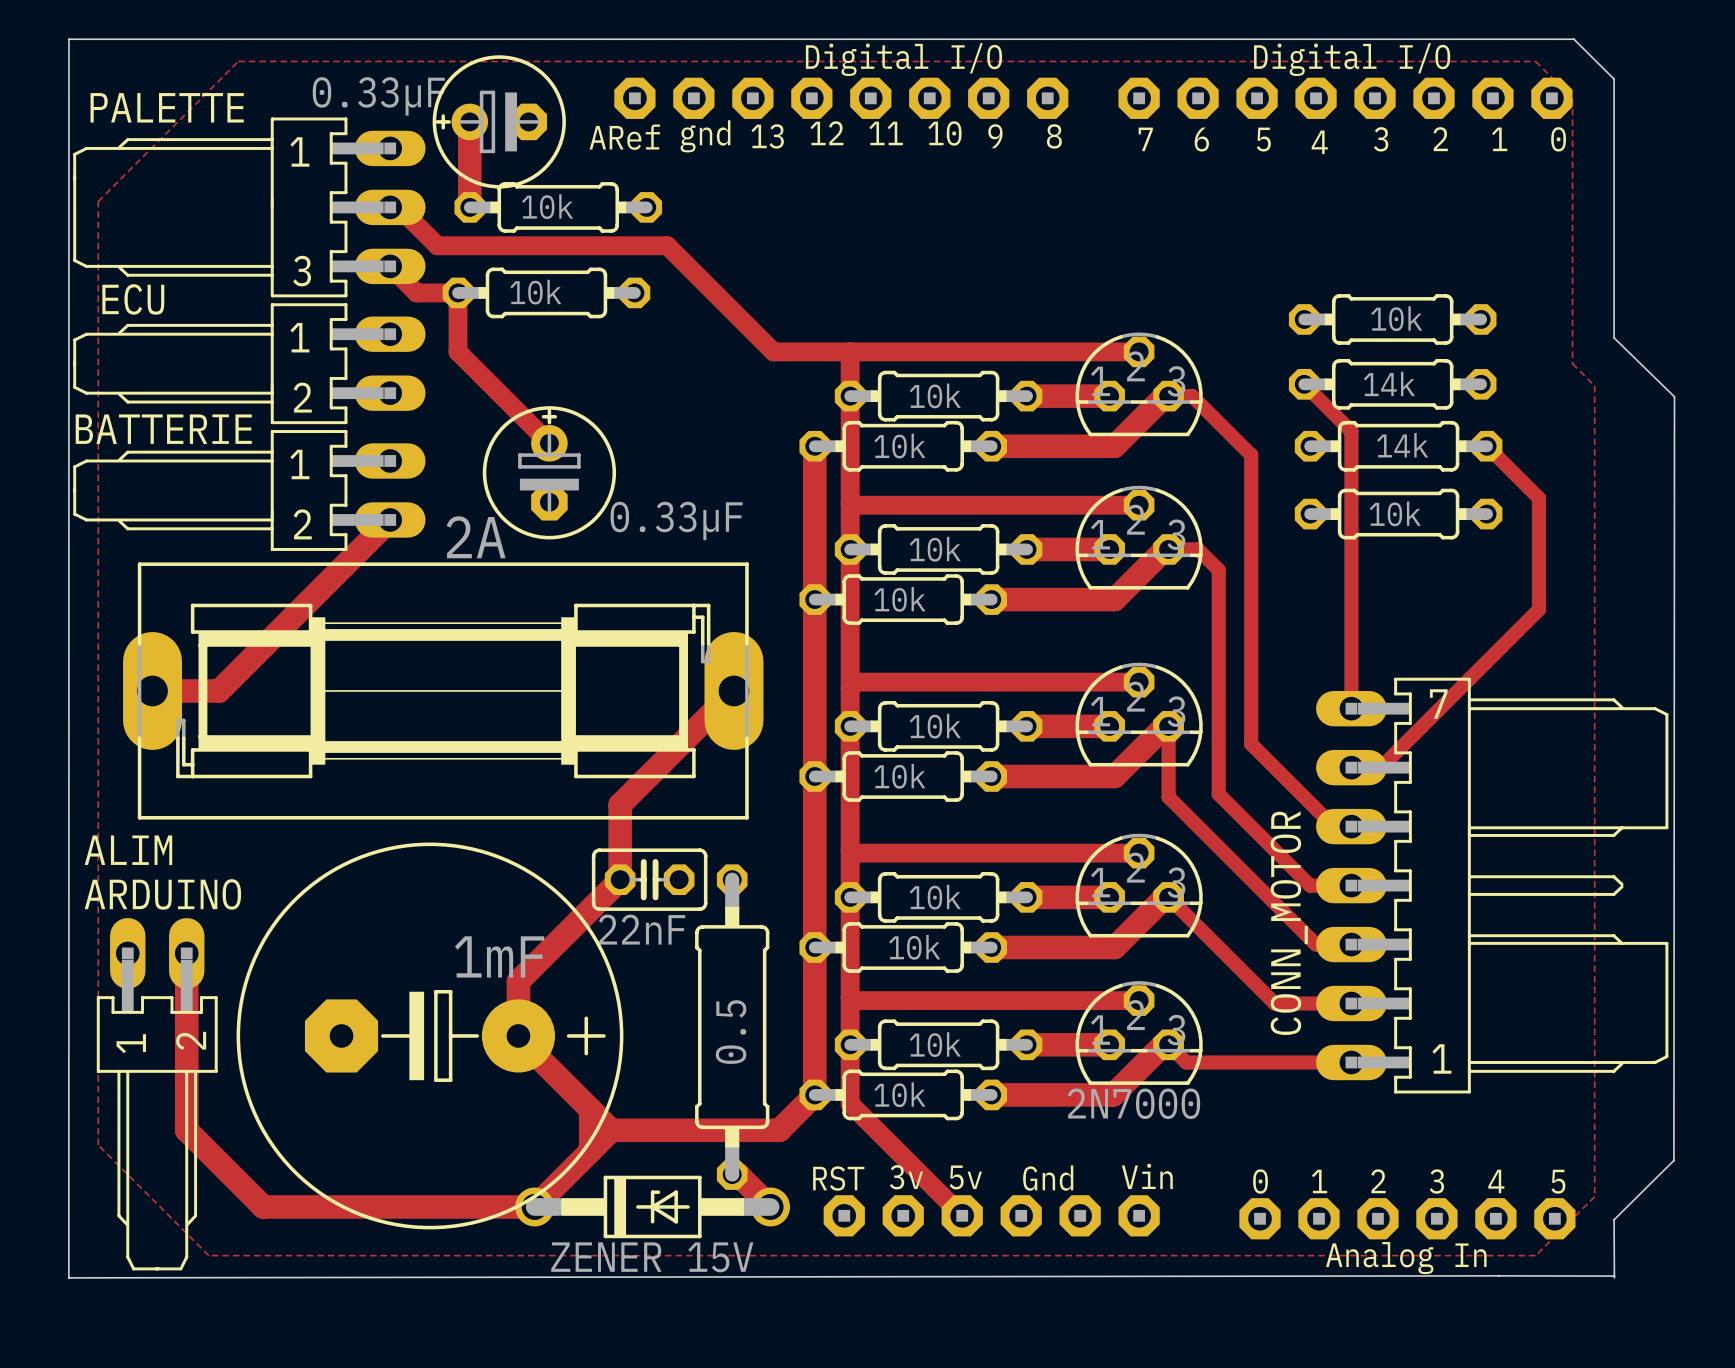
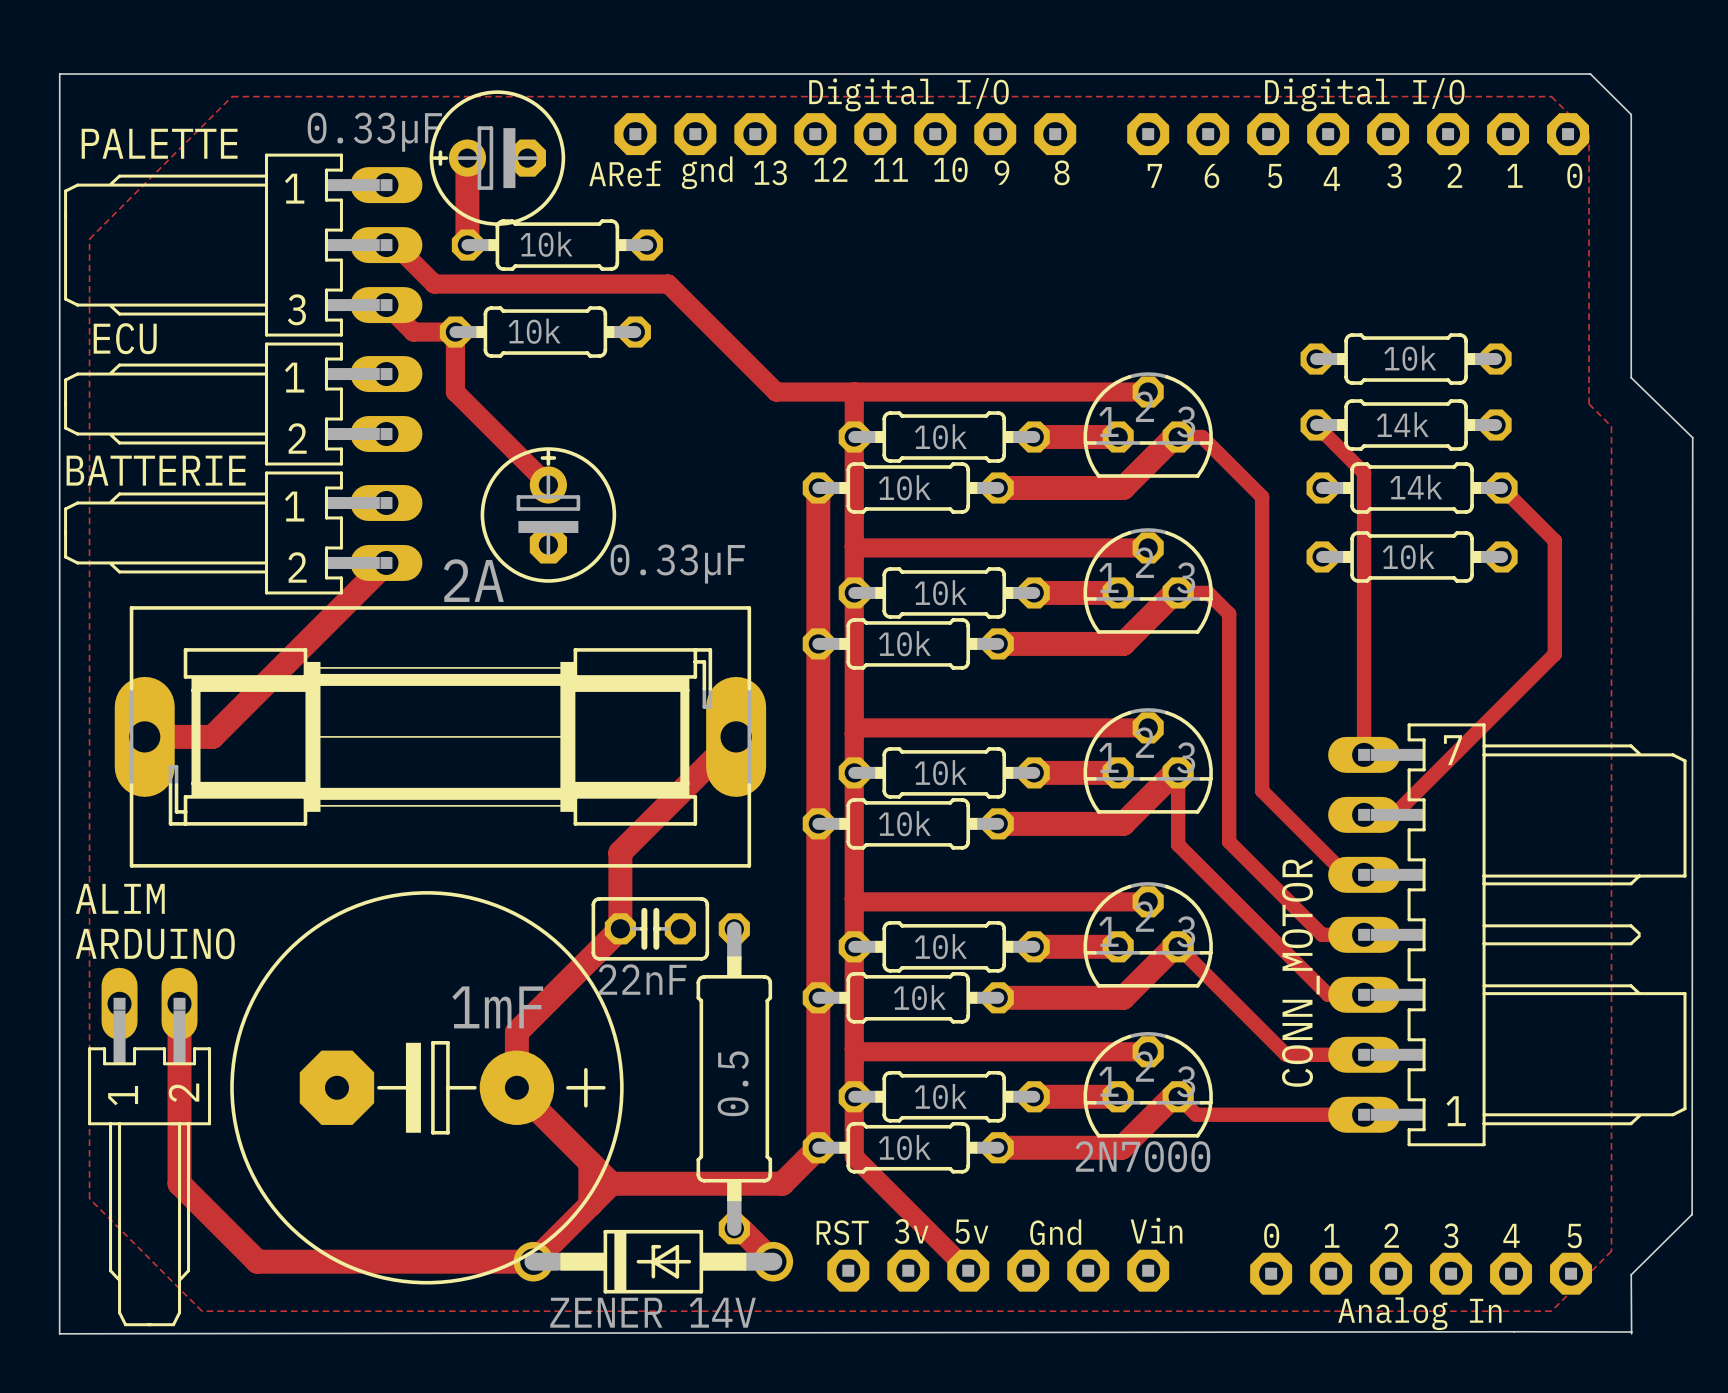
part value: ZENER 15V (652, 1257) -> ZENER 14V (653, 1312)

